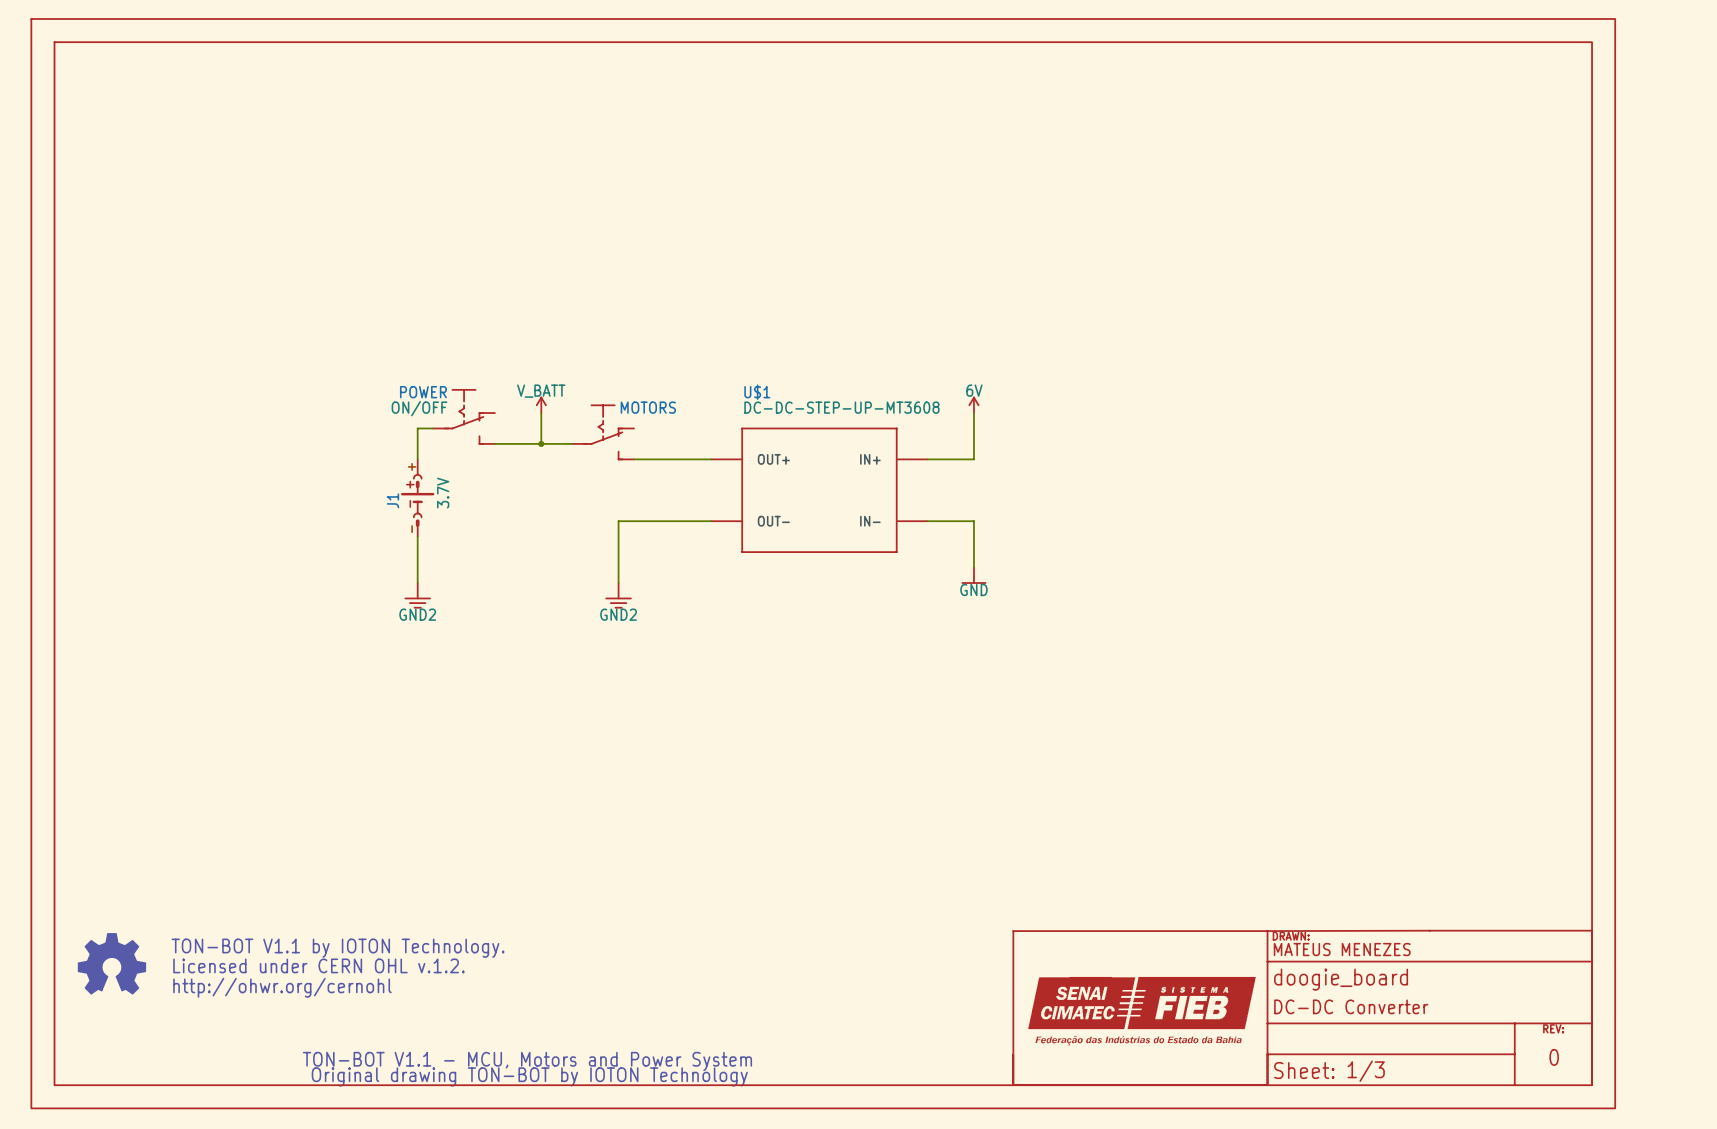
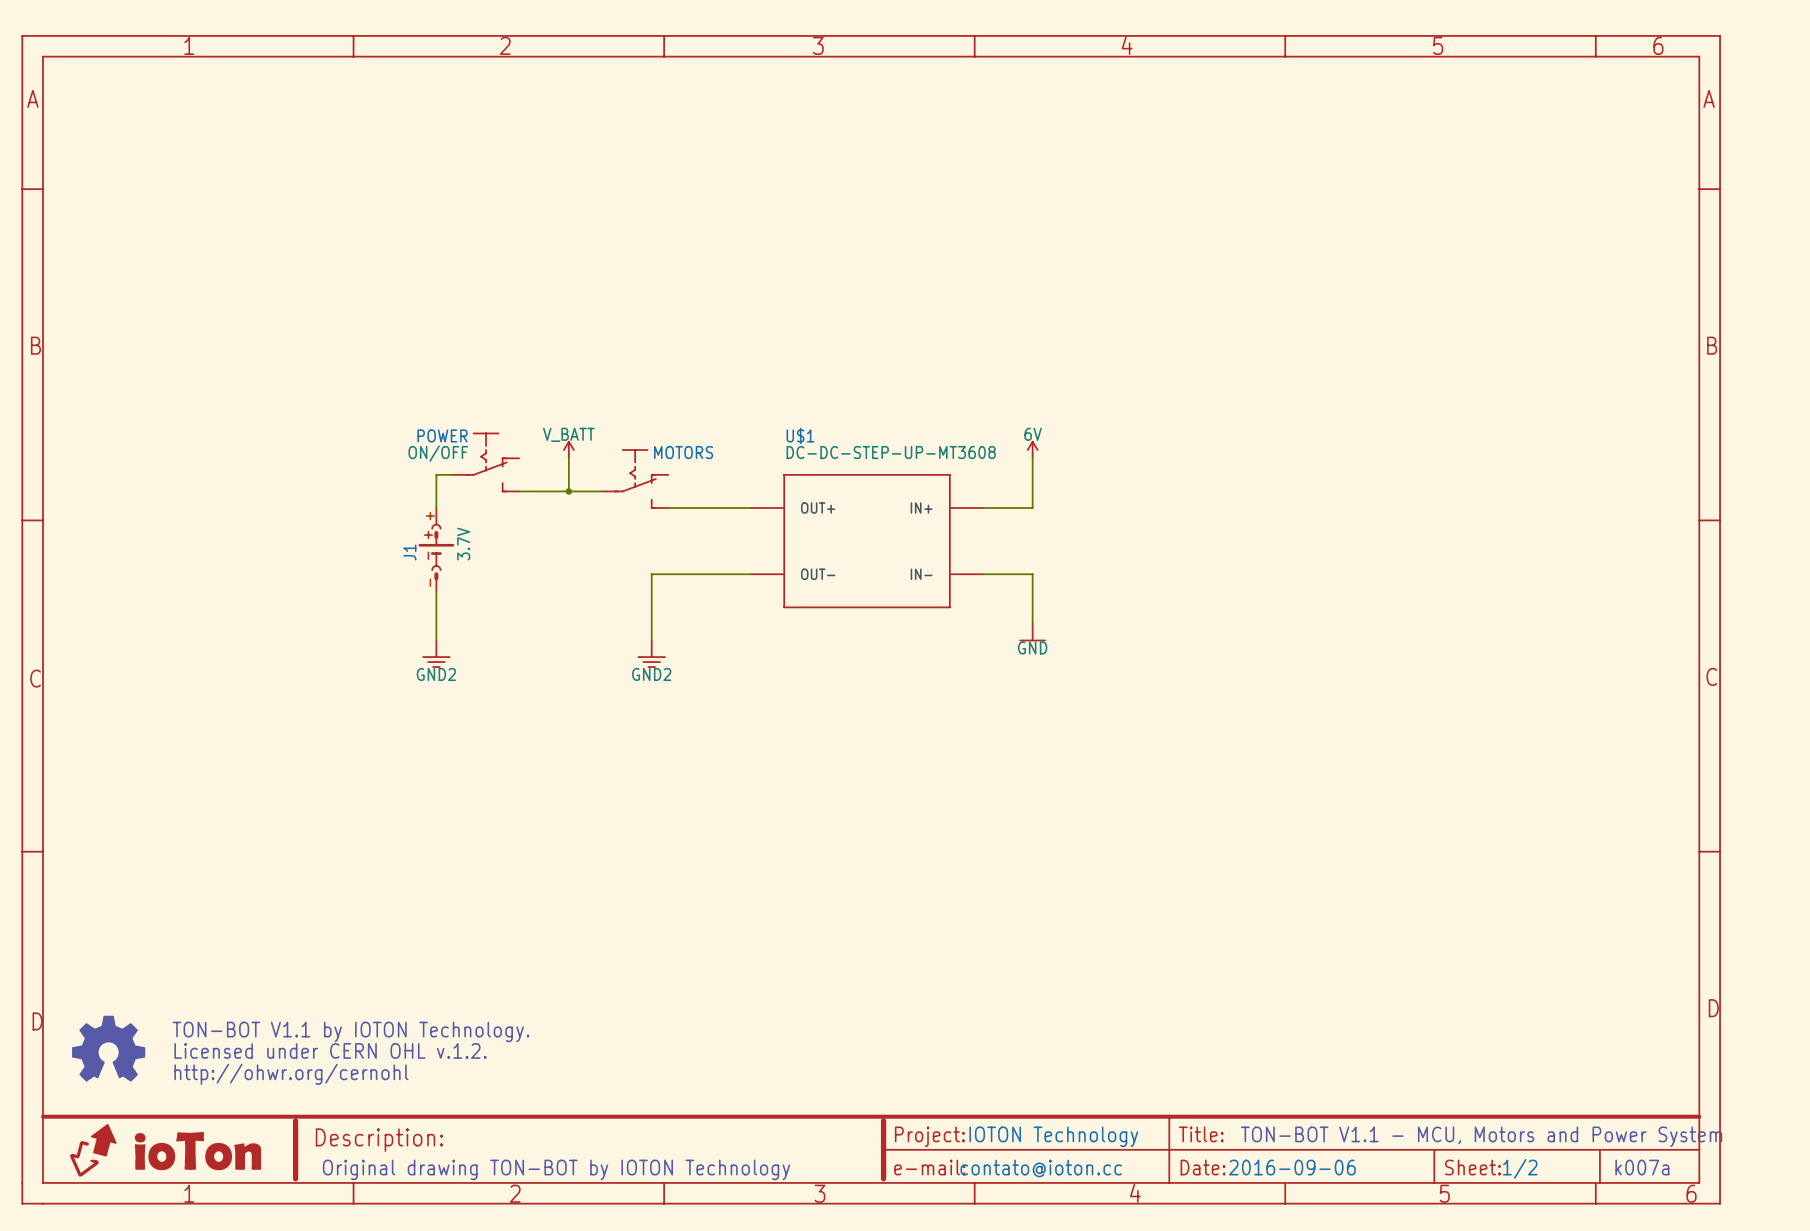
part: (823, 563) -> none
1/2: none -> 2016-09-06 (871, 619)
text: none -> TON-BOT V1.1 - MCU, Motors and Power System (1481, 1136)
text: TON-BOT V1.1 - MCU, Motors and Power System (527, 1061) -> none
text: none -> k007a (1642, 1167)

